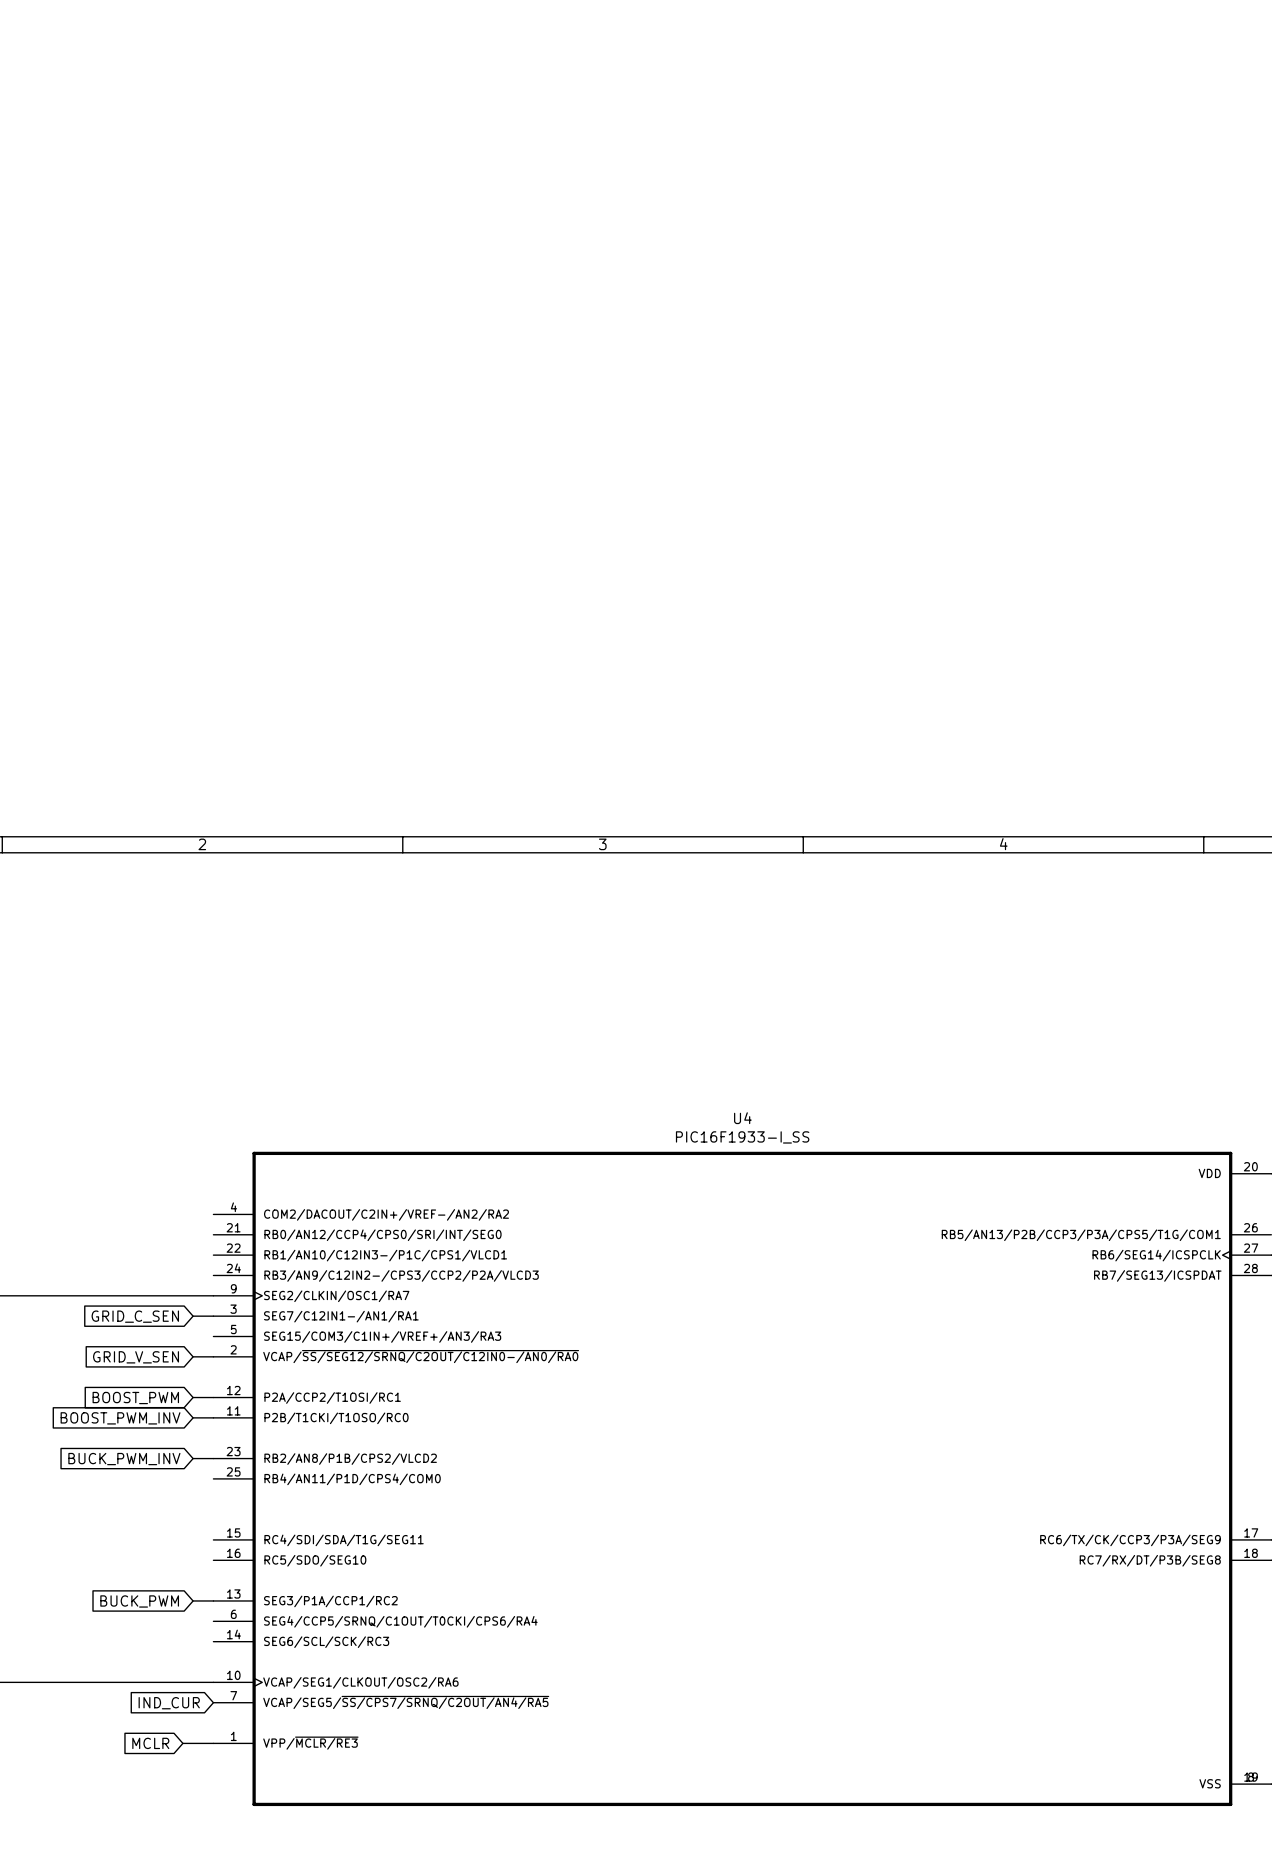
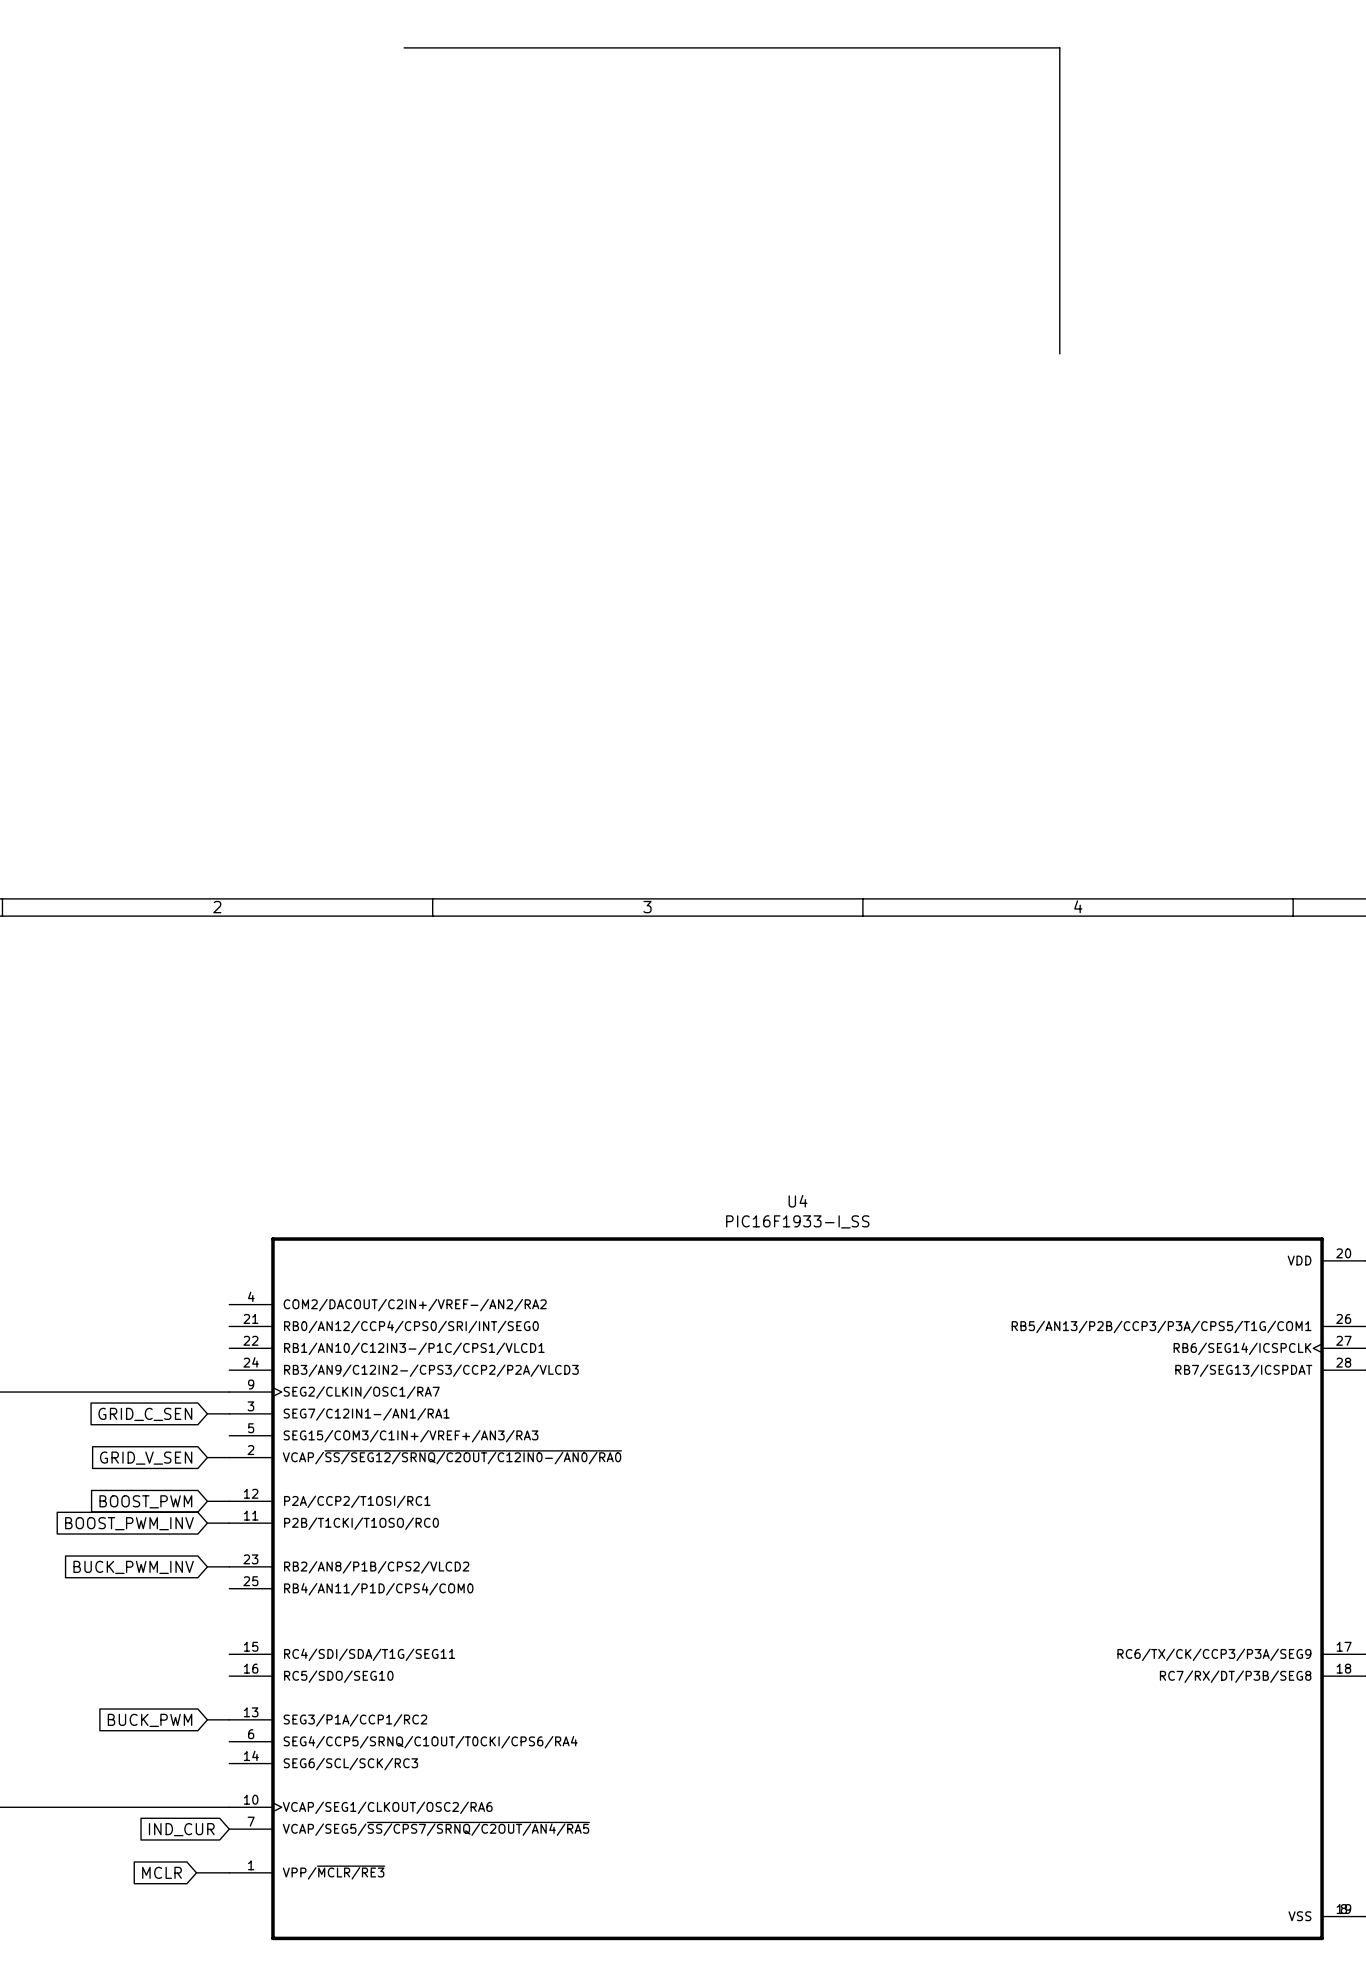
wire: none -> (404, 47) (1059, 47) (1059, 353)

